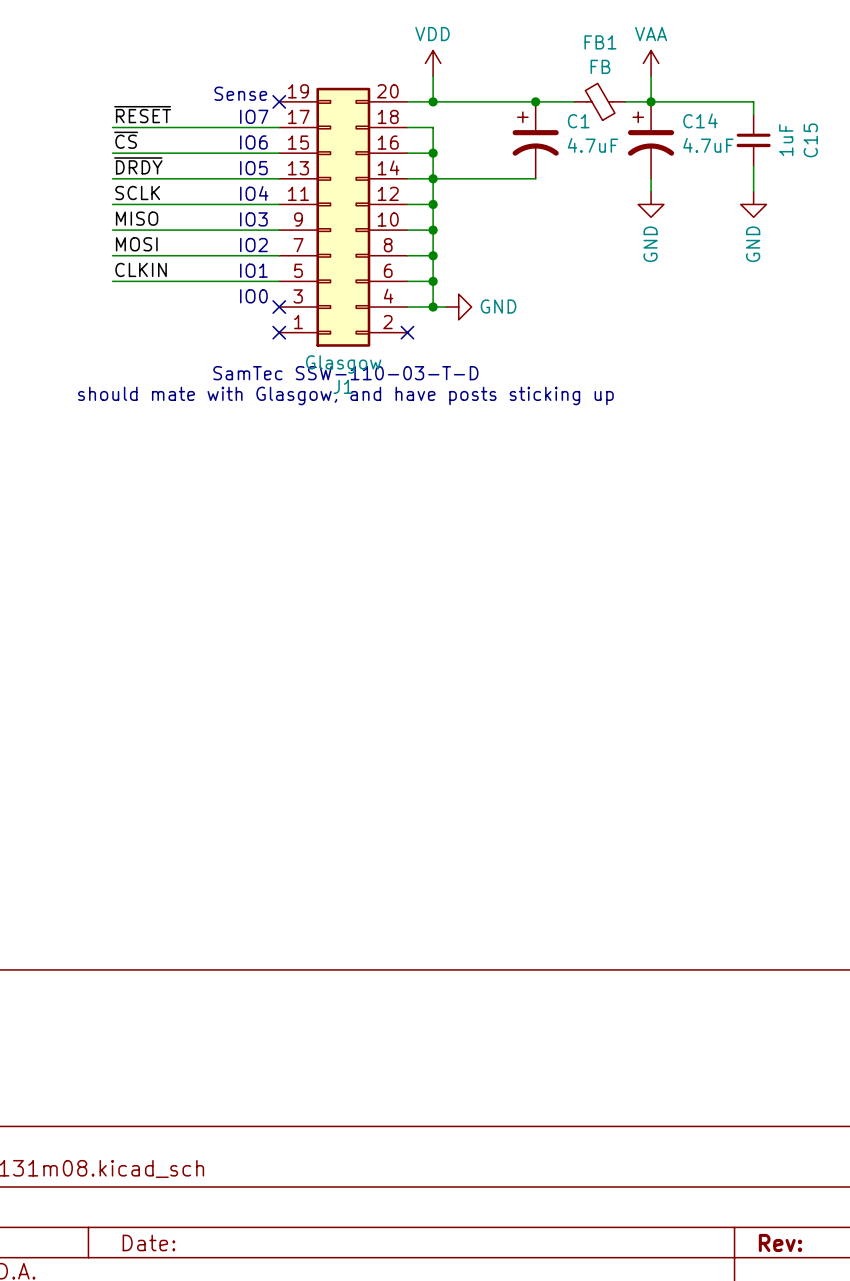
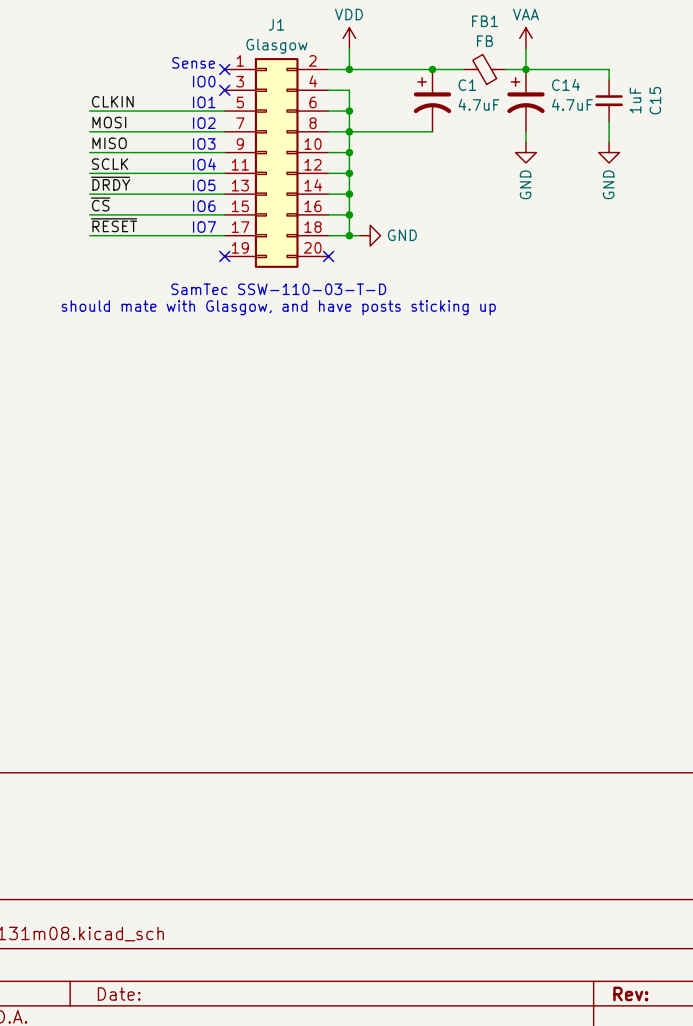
label position: ~{RESET} (142, 114) -> ~{RESET} (114, 225)
text: IO7 (254, 116) -> IO0 (204, 81)
wire: (112, 127) (279, 127) -> (89, 235) (224, 235)
no-connect mark: none -> (224, 90)
label: ~{CS} (126, 140) -> CLKIN (112, 101)
text: IO6 (253, 142) -> IO1 (204, 102)
label: ~{DRDY} (138, 165) -> MOSI (109, 122)
text: IO5 (253, 168) -> IO2 (204, 123)
label: SCLK (137, 193) -> MISO (109, 143)
text: IO4 (254, 193) -> IO3 (204, 143)
J1 flip: as is (343, 217) -> up-down (276, 162)
label: MISO (137, 218) -> SCLK (110, 164)
text: IO3 (253, 219) -> IO4 (204, 164)
label: MOSI (136, 244) -> ~{DRDY} (110, 183)
text: IO2 (253, 245) -> IO5 (204, 185)
label: CLKIN (141, 269) -> ~{CS} (100, 204)
text: IO1 (253, 270) -> IO6 (204, 206)
text: IO0 (253, 296) -> IO7 (204, 227)
no-connect mark: (279, 307) -> none

